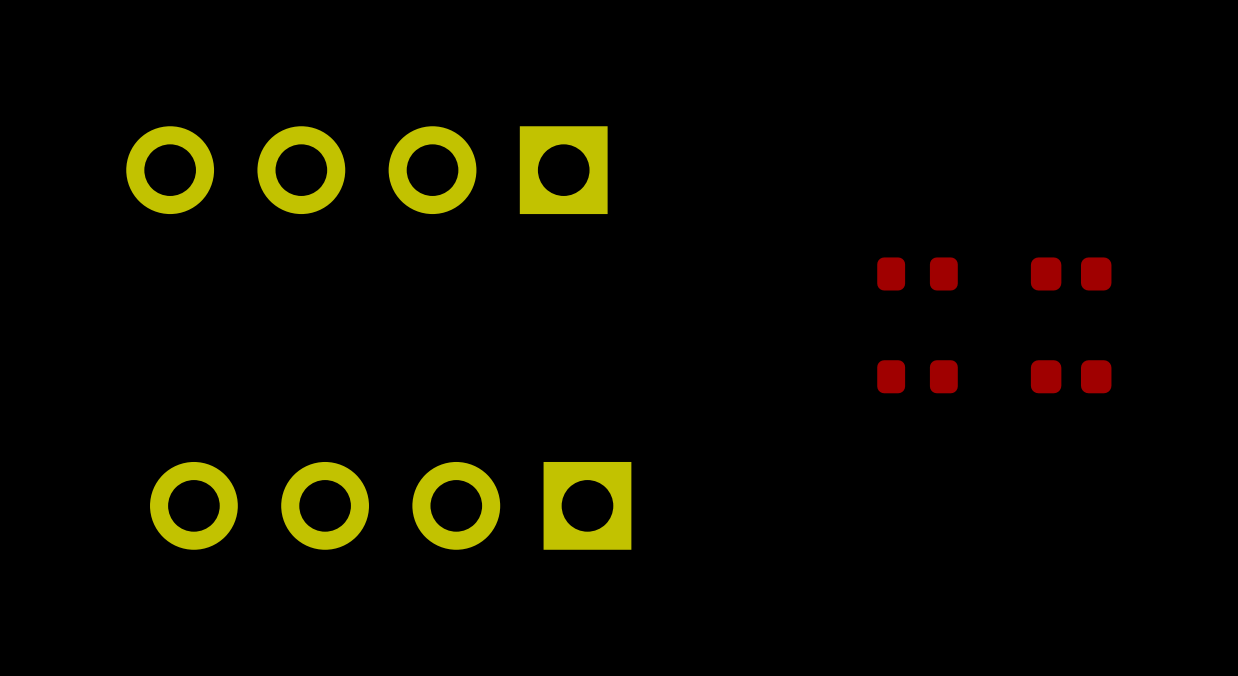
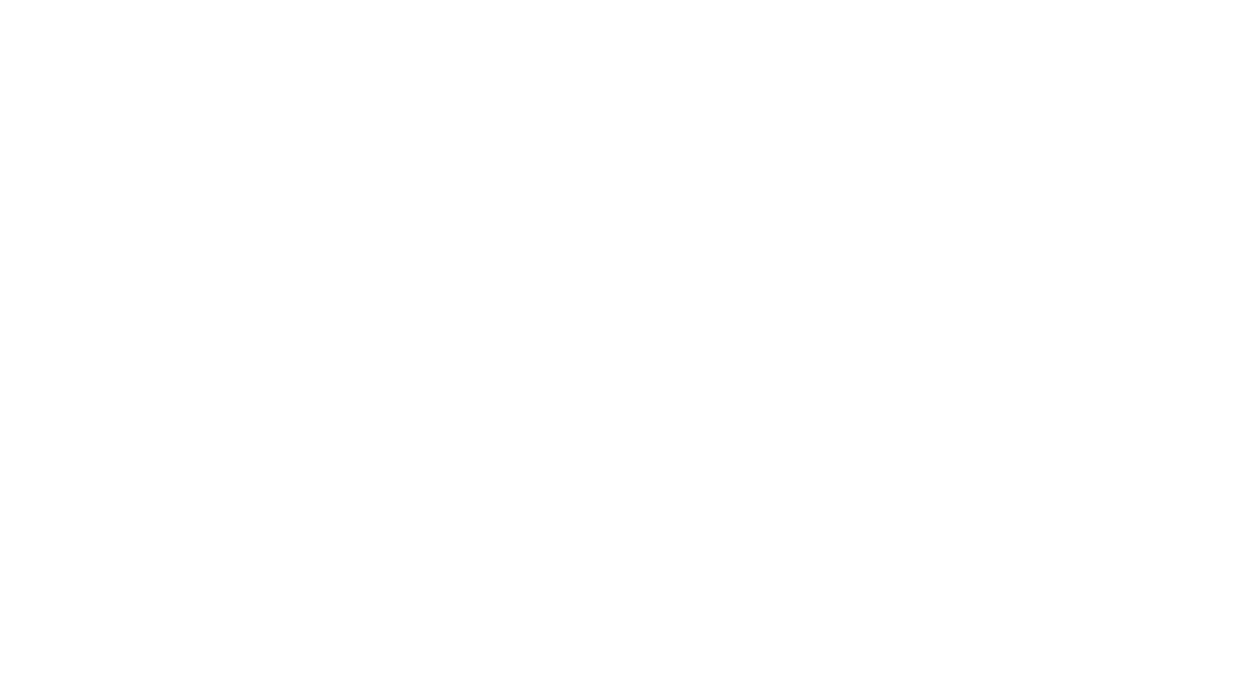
part: (366, 170) -> none
part: (917, 273) -> none
part: (1071, 273) -> none
part: (917, 376) -> none
part: (1071, 376) -> none
part: (390, 505) -> none

